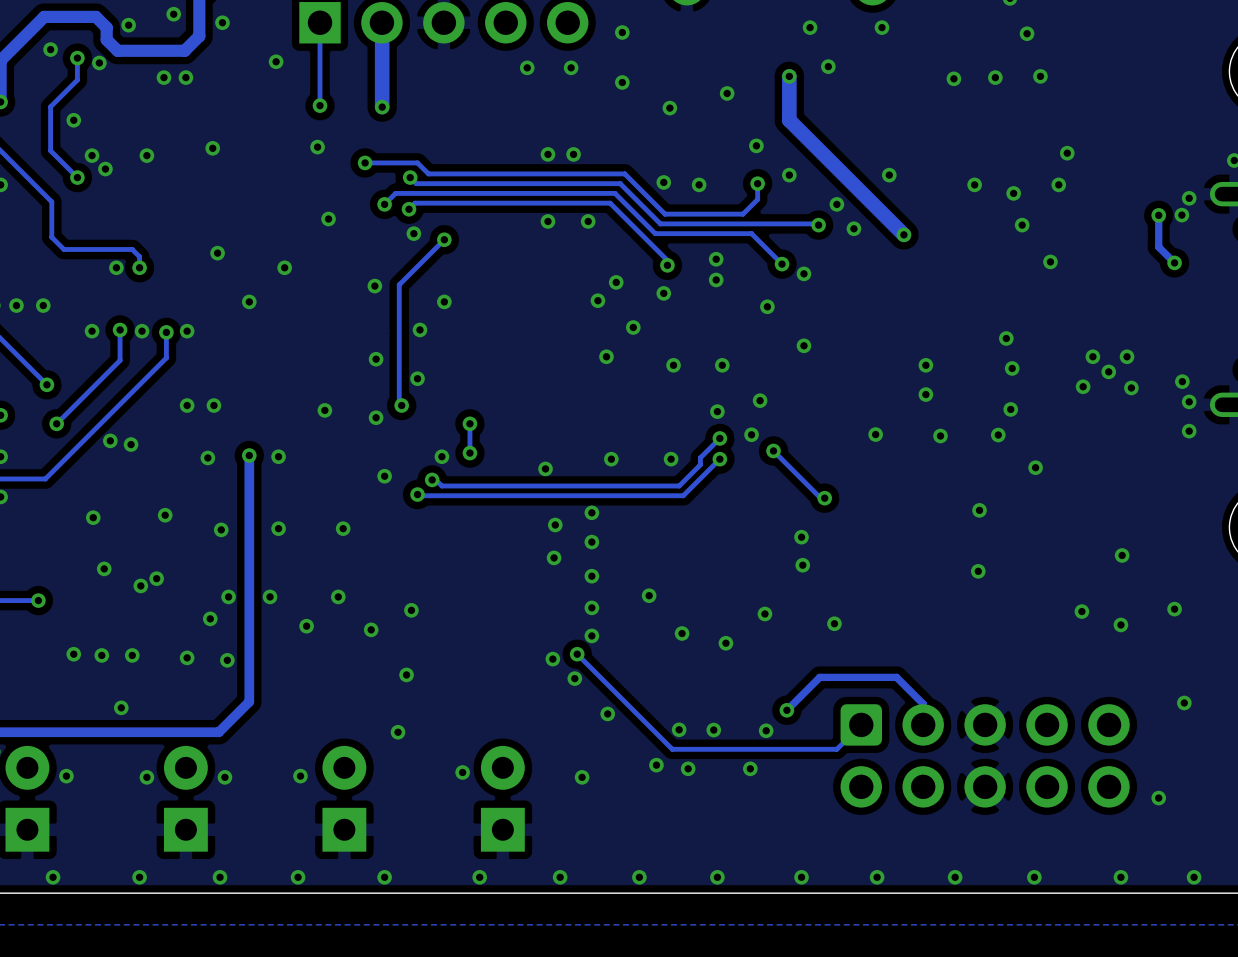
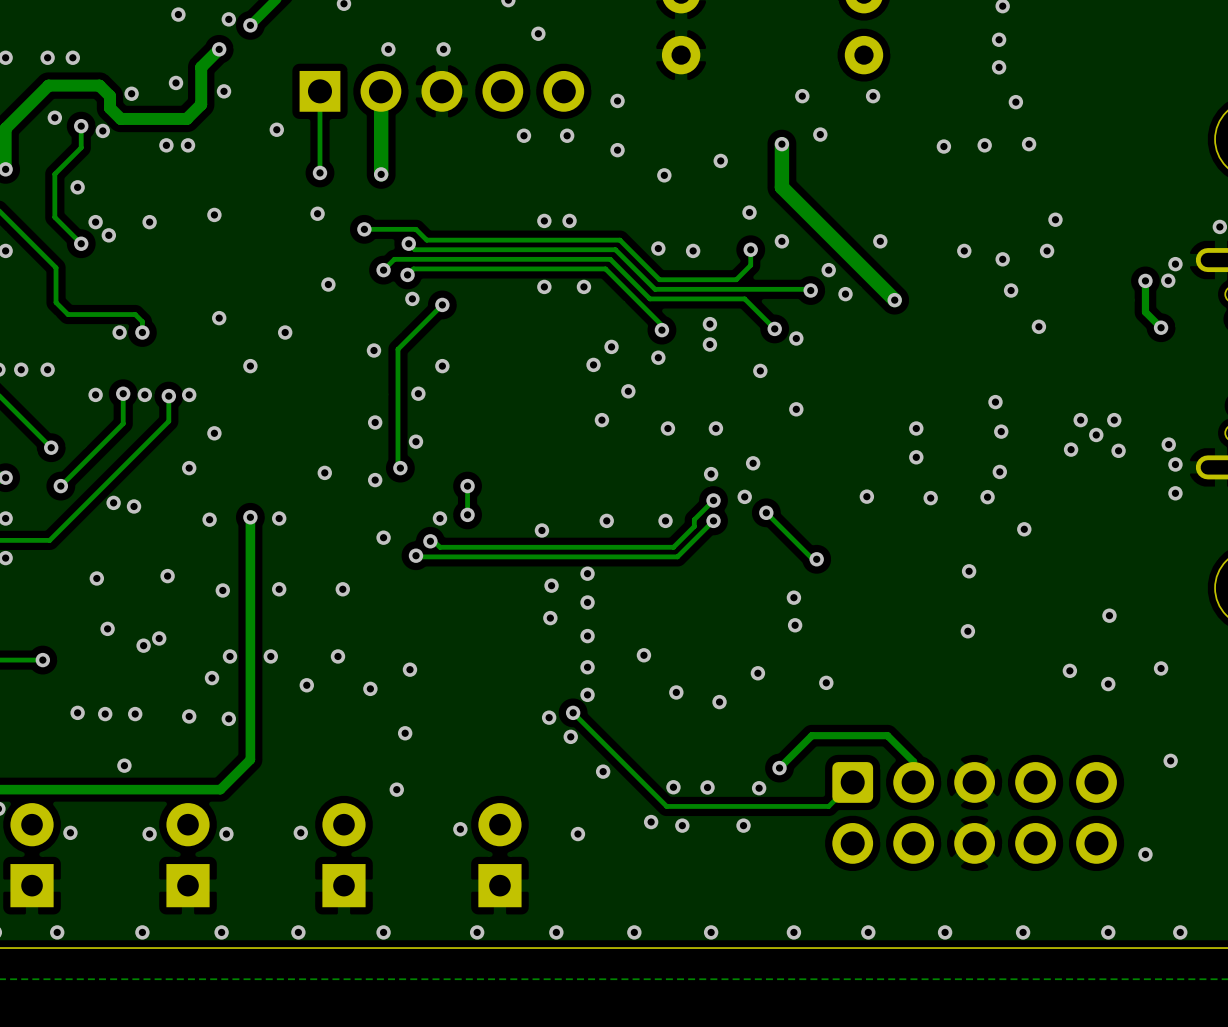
via position: (213, 405) -> (214, 433)

